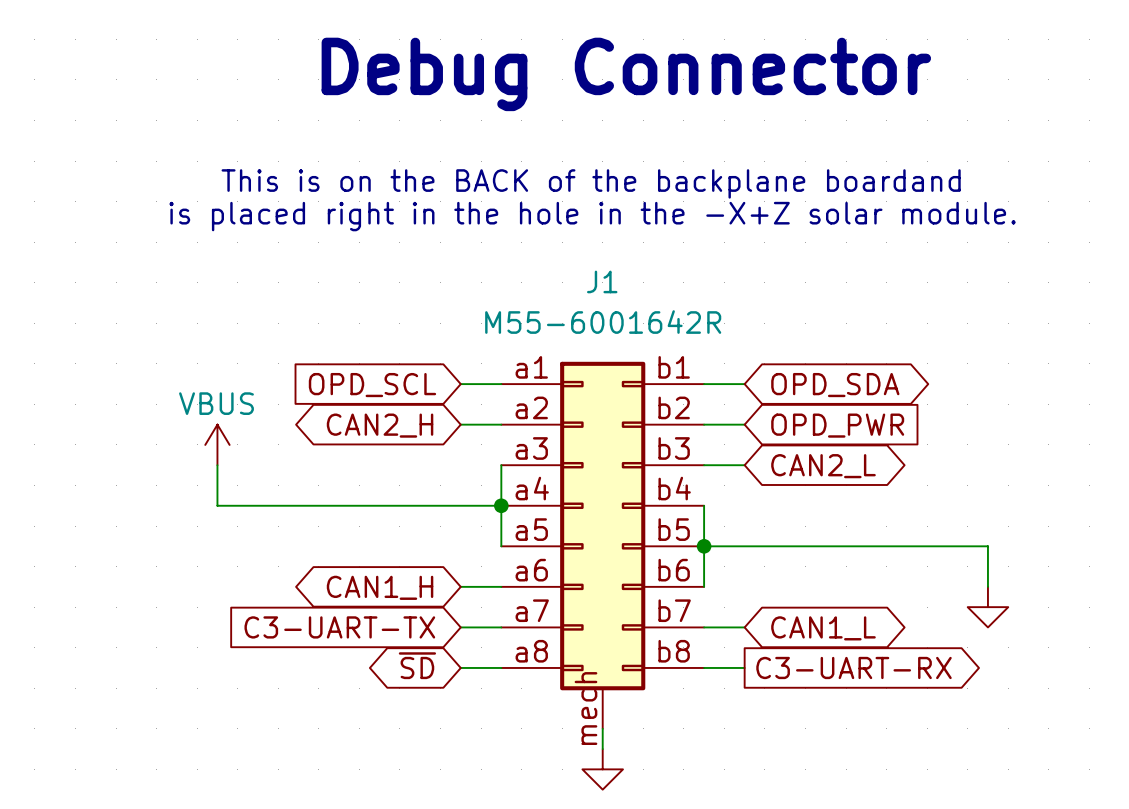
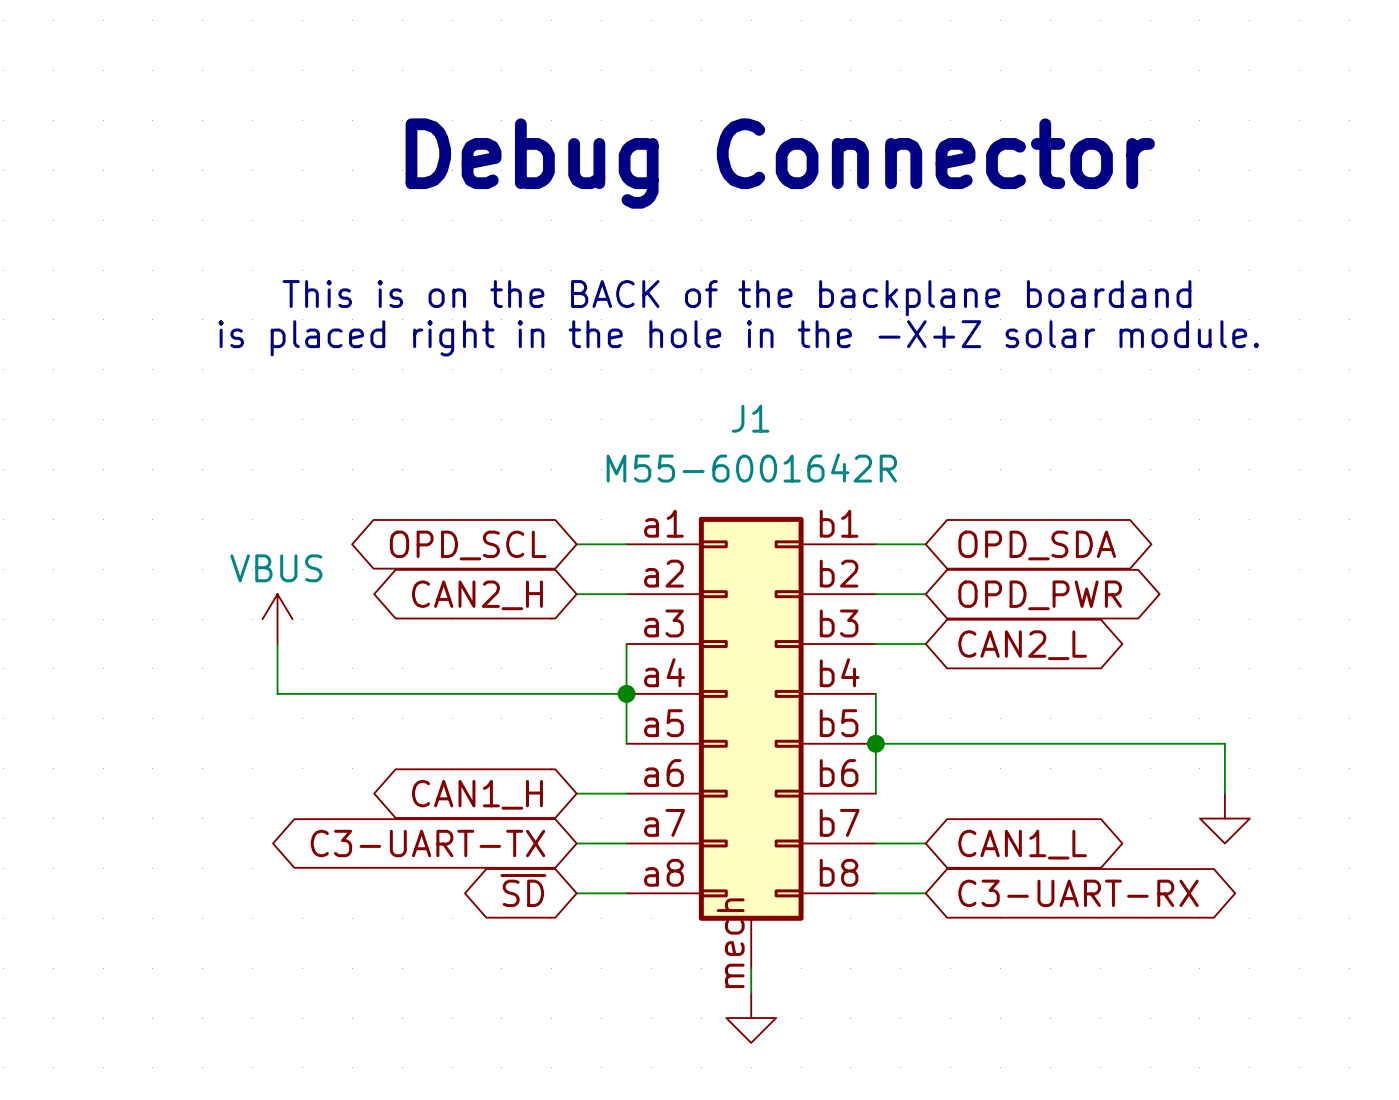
global label shape: input (372, 385) -> bidirectional (468, 545)
global label shape: input (837, 425) -> bidirectional (1040, 595)
global label shape: input (339, 627) -> bidirectional (427, 843)
global label shape: output (854, 667) -> bidirectional (1078, 893)

